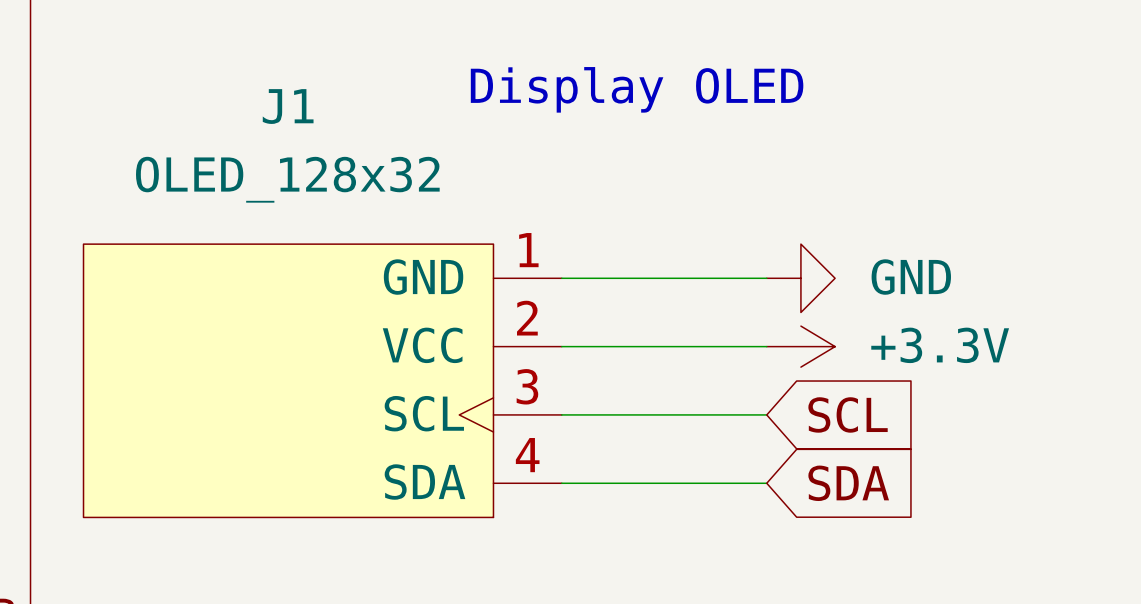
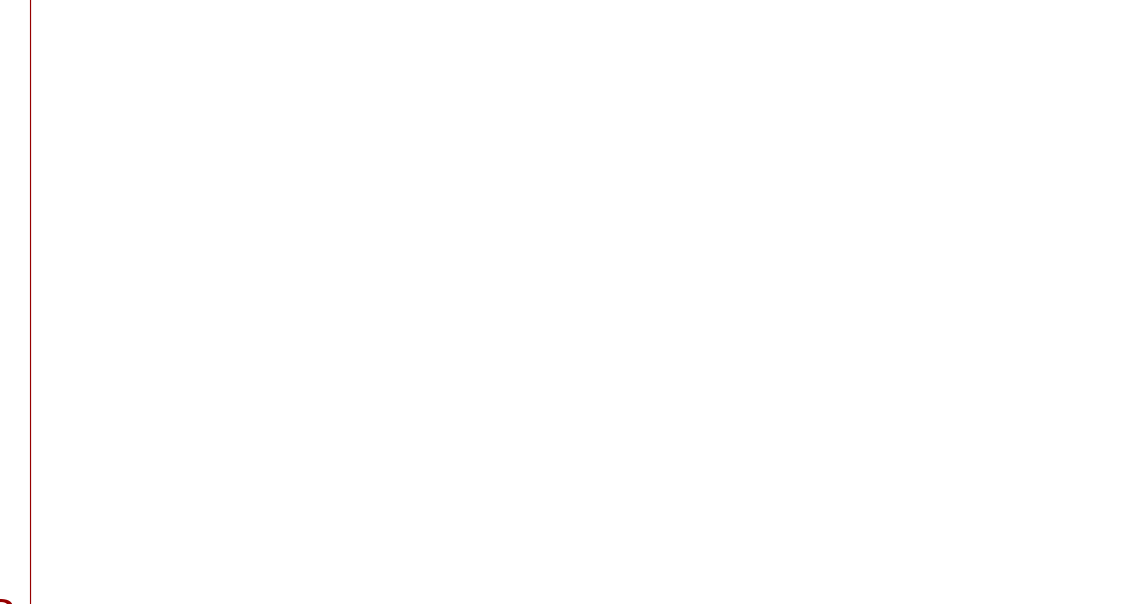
text: Display OLED (637, 89) -> none
wire: (561, 278) (766, 278) -> none
power symbol: GND (800, 278) -> none
wire: (561, 346) (766, 346) -> none
power symbol: +3.3V (800, 346) -> none
J1: OLED_128x32 (322, 380) -> none
wire: (561, 414) (766, 414) -> none
global label: SCL (848, 414) -> none
wire: (561, 483) (766, 483) -> none
global label: SDA (848, 483) -> none

